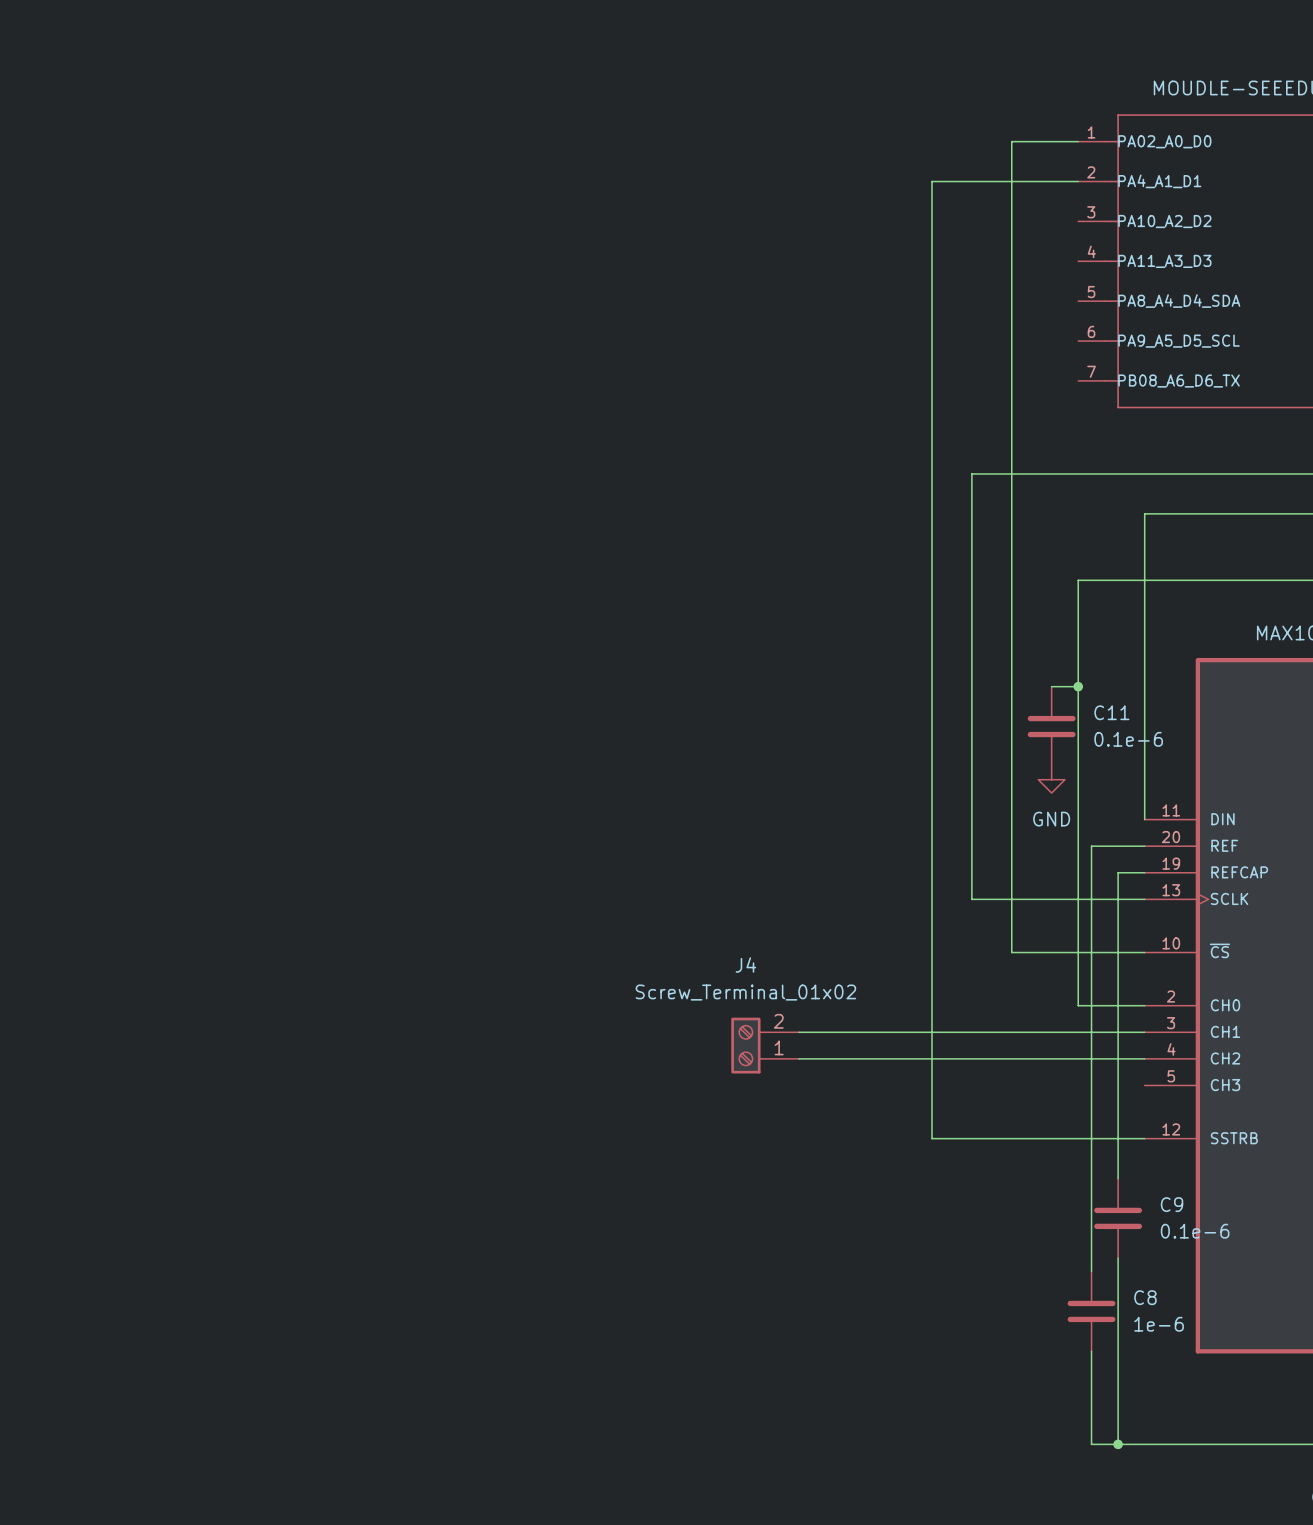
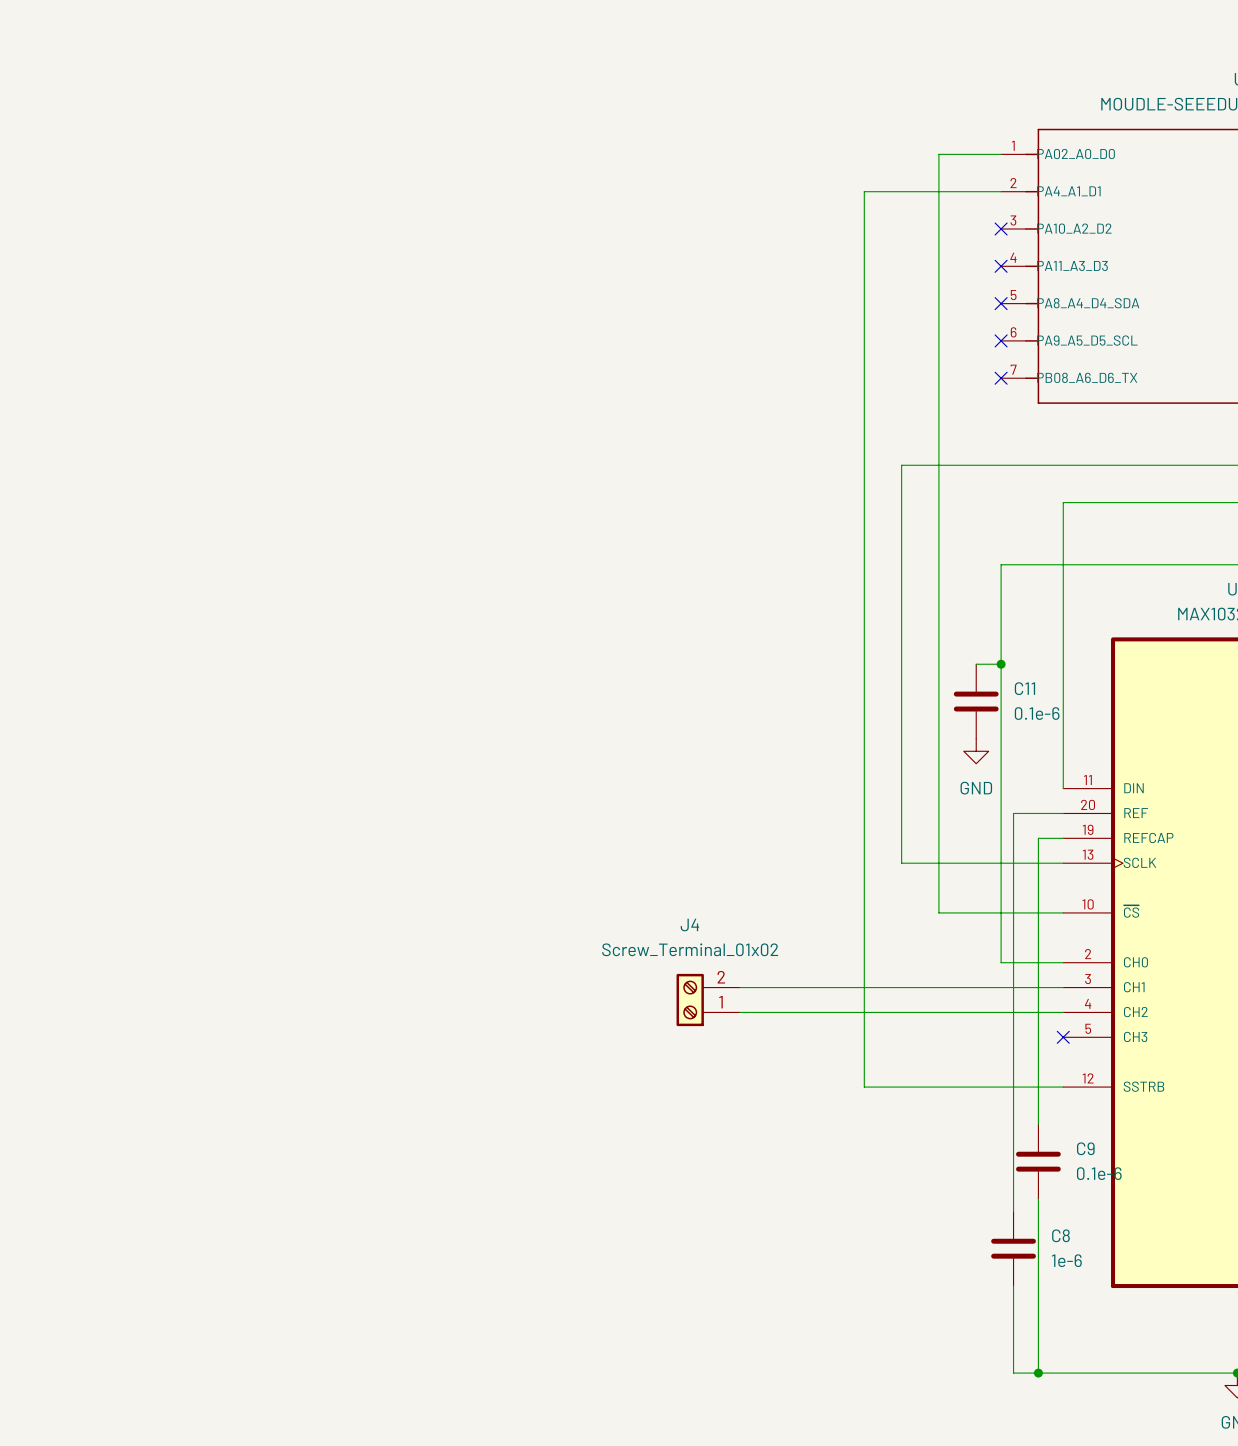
no-connect mark: none -> (1001, 229)
no-connect mark: none -> (1001, 266)
no-connect mark: none -> (1001, 303)
no-connect mark: none -> (1001, 340)
no-connect mark: none -> (1001, 378)
no-connect mark: none -> (1063, 1037)

